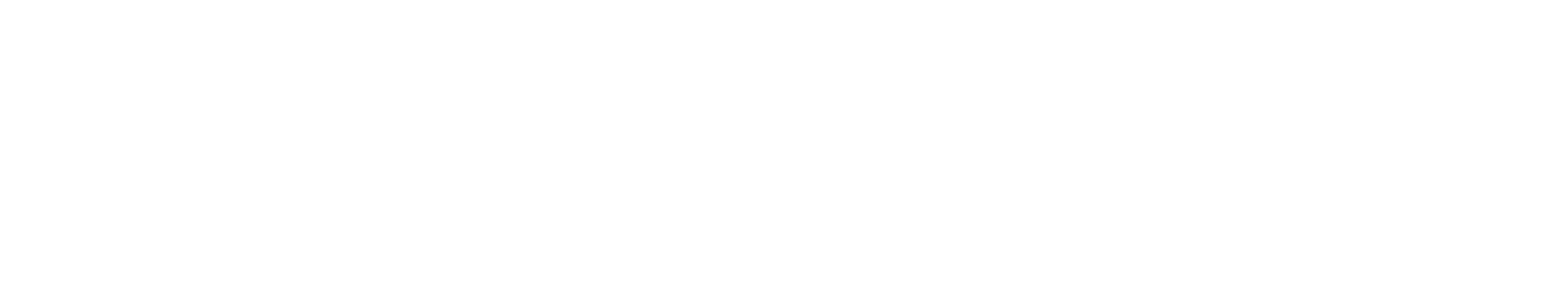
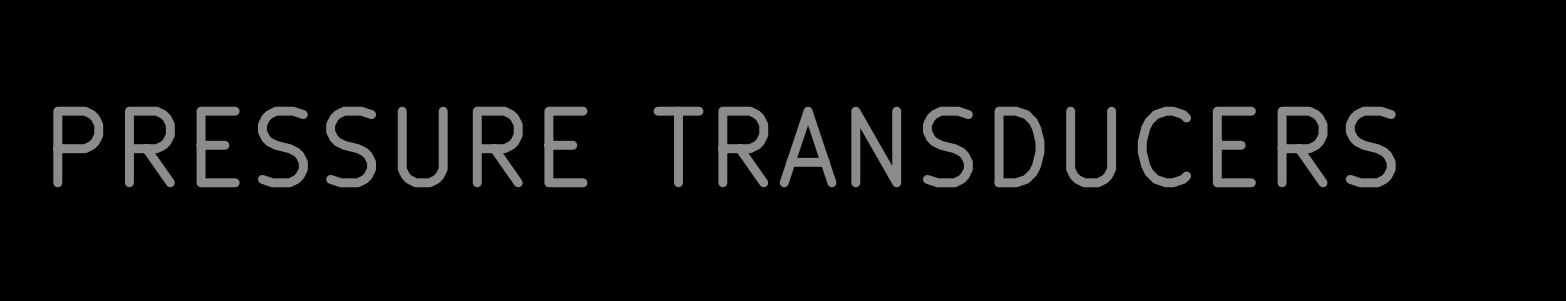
text: none -> PRESSURE TRANSDUCERS (724, 146)

